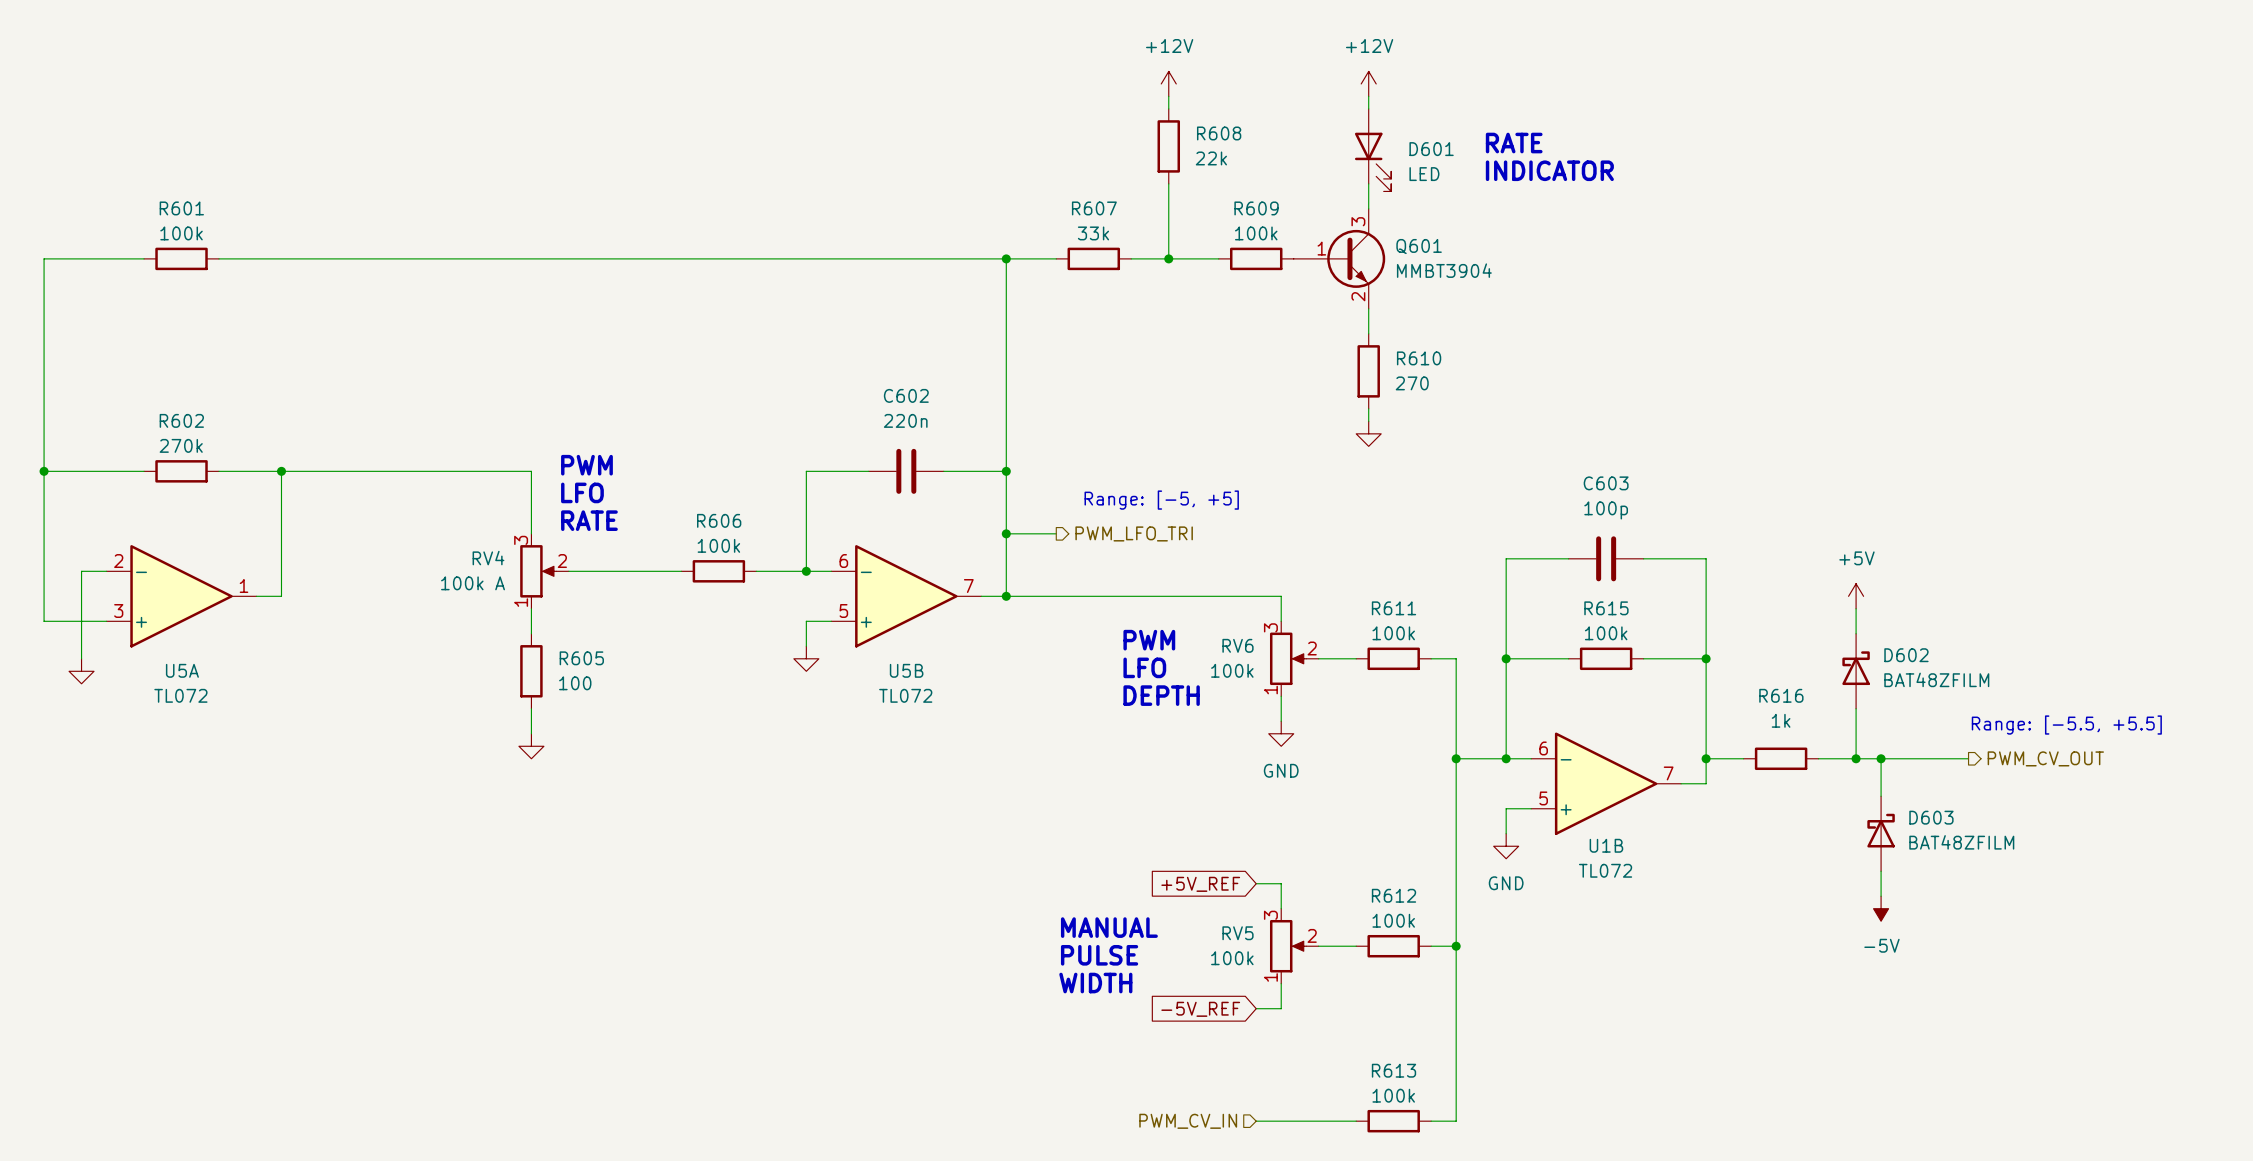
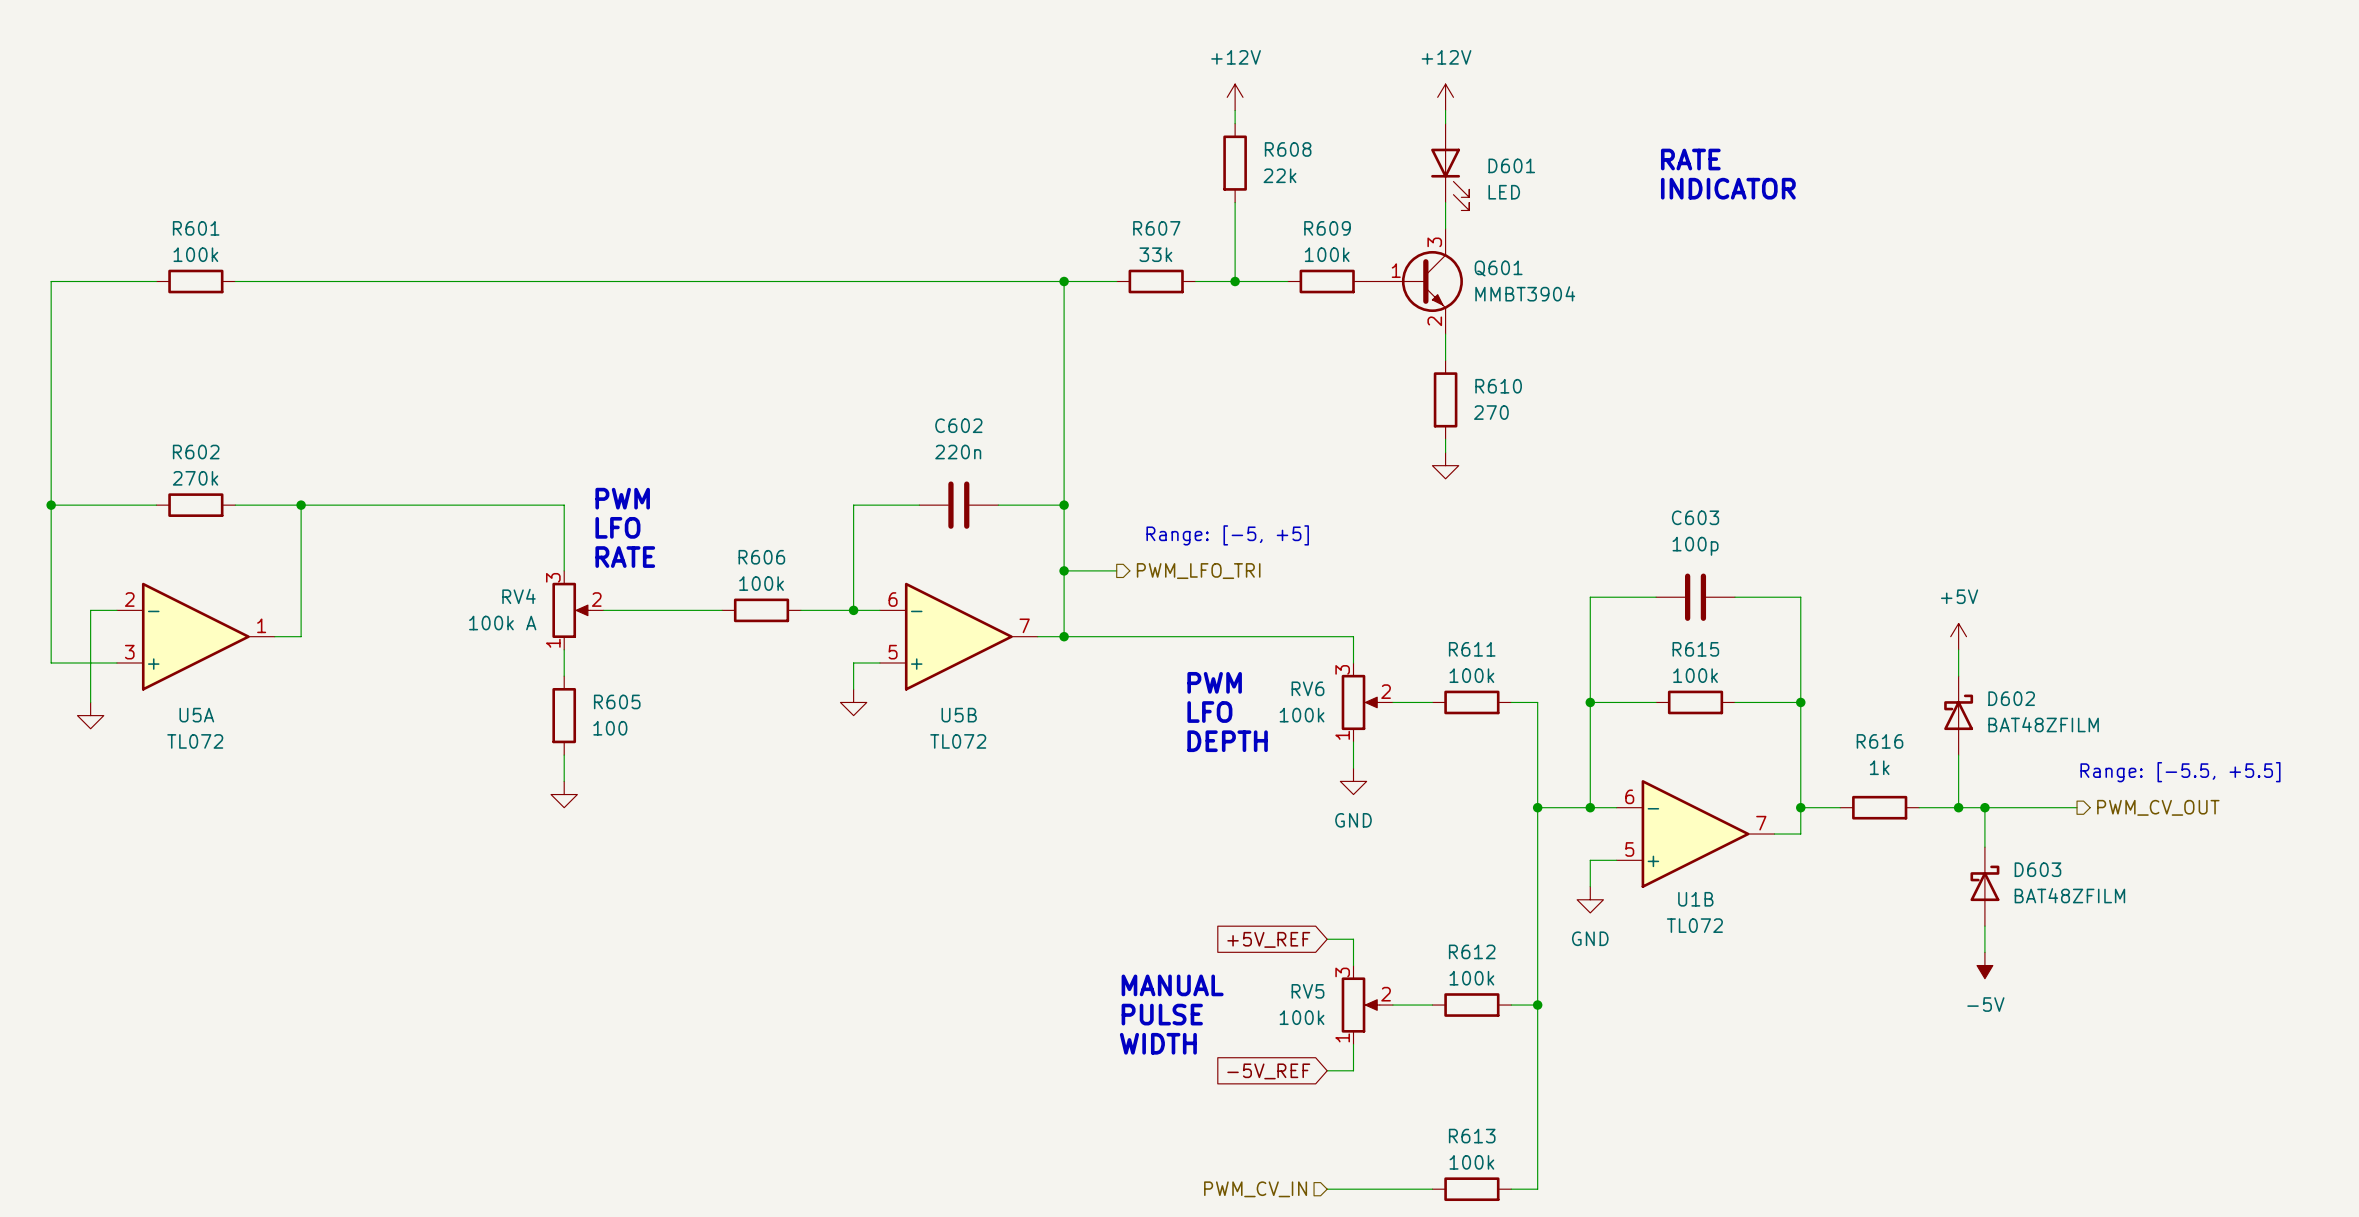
text position: RATE (1514, 143) -> RATE (1690, 159)
text position: INDICATOR (1549, 170) -> INDICATOR (1728, 188)

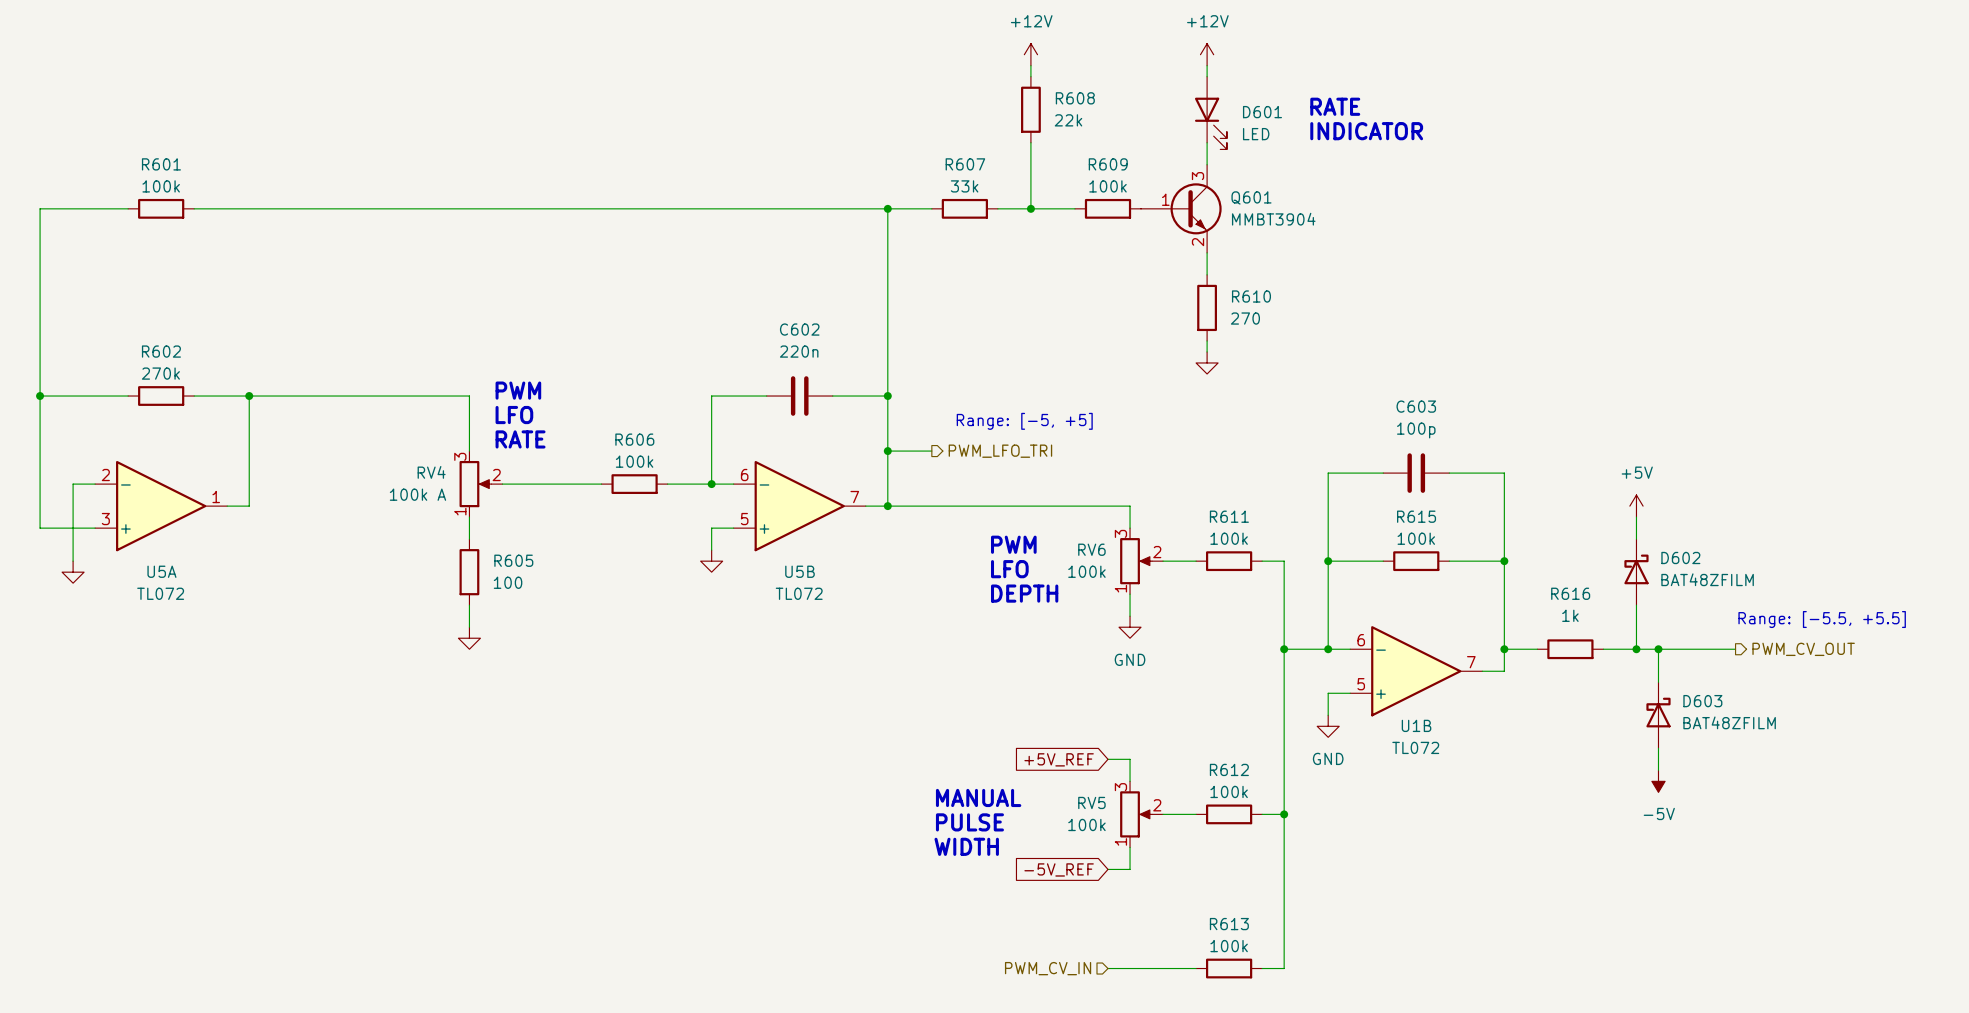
text position: RATE (1690, 159) -> RATE (1335, 106)
text position: INDICATOR (1728, 188) -> INDICATOR (1366, 131)

